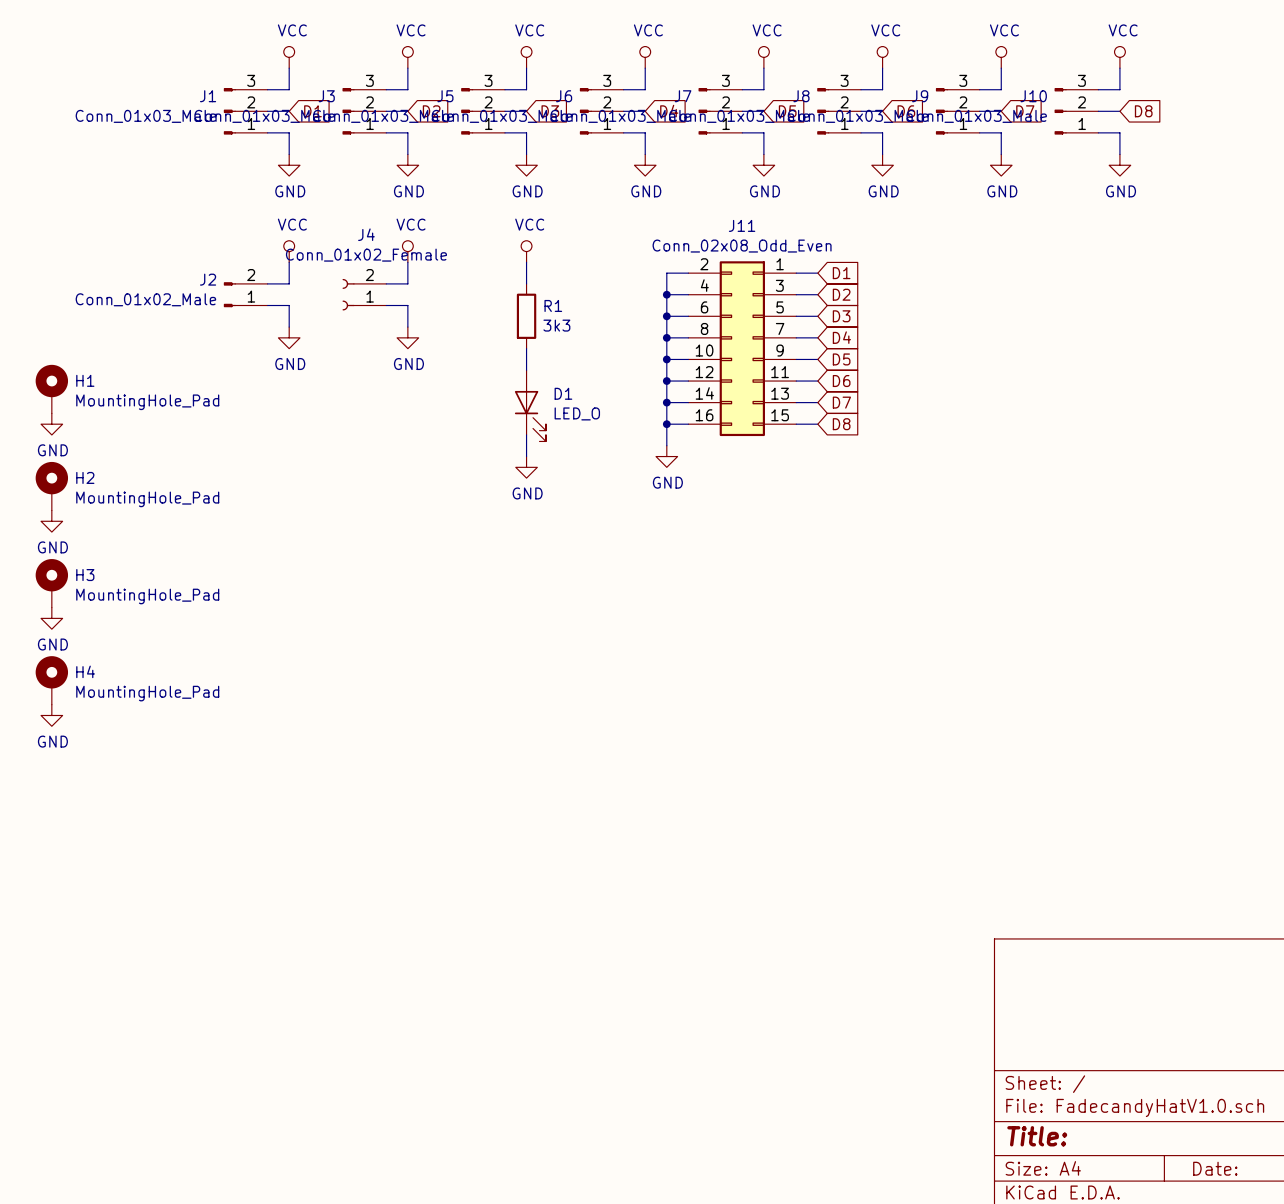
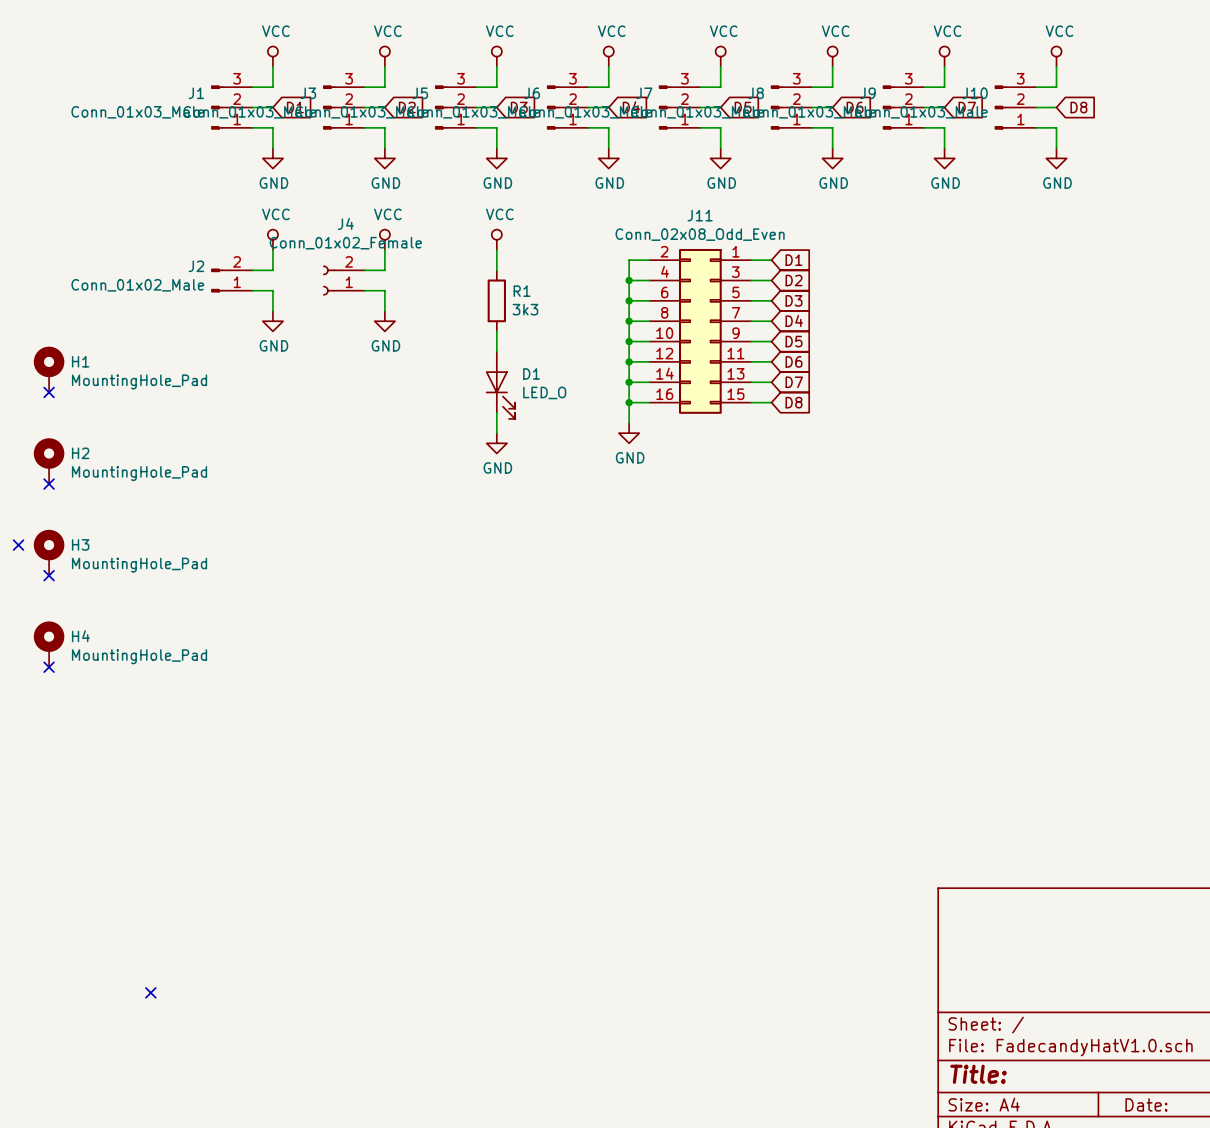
no-connect mark: none -> (49, 392)
power symbol: GND (51, 424) -> none
no-connect mark: none -> (49, 484)
power symbol: GND (51, 521) -> none
no-connect mark: none -> (18, 545)
no-connect mark: none -> (49, 575)
power symbol: GND (51, 618) -> none
no-connect mark: none -> (49, 667)
power symbol: GND (51, 715) -> none
no-connect mark: none -> (150, 992)

